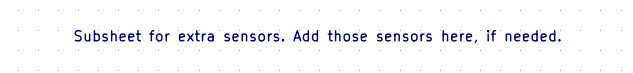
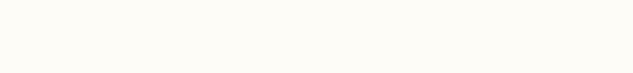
text: Subsheet for extra sensors. Add those sensors here, if needed. (317, 36) -> none

